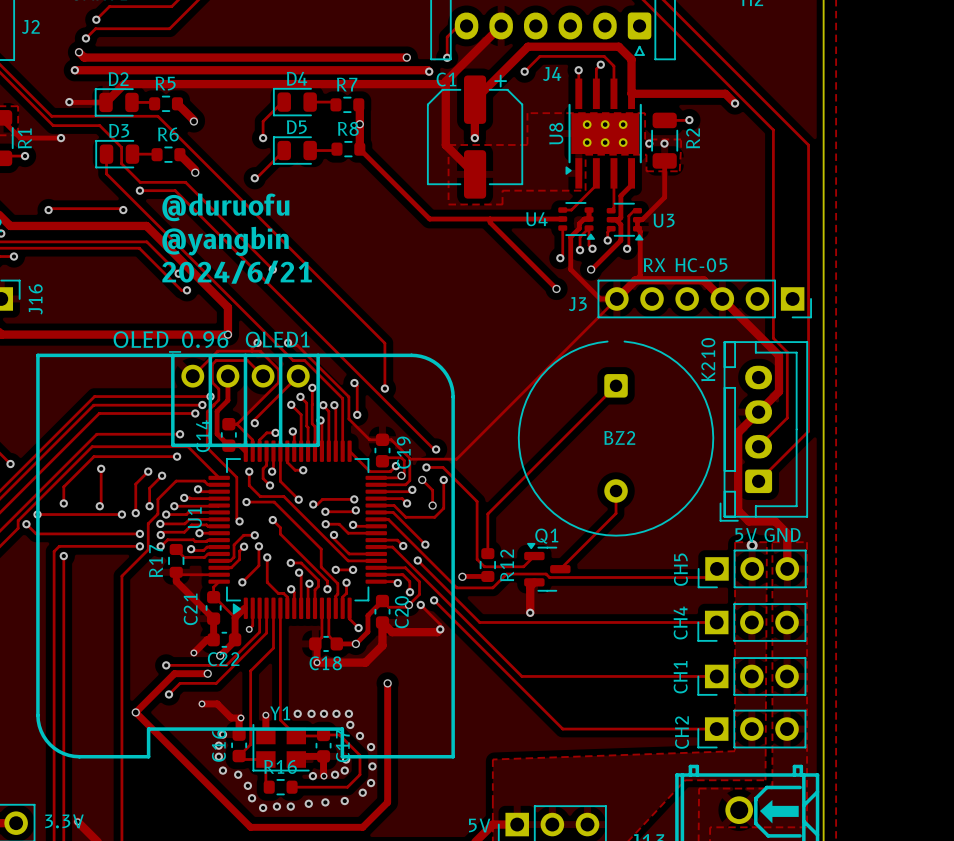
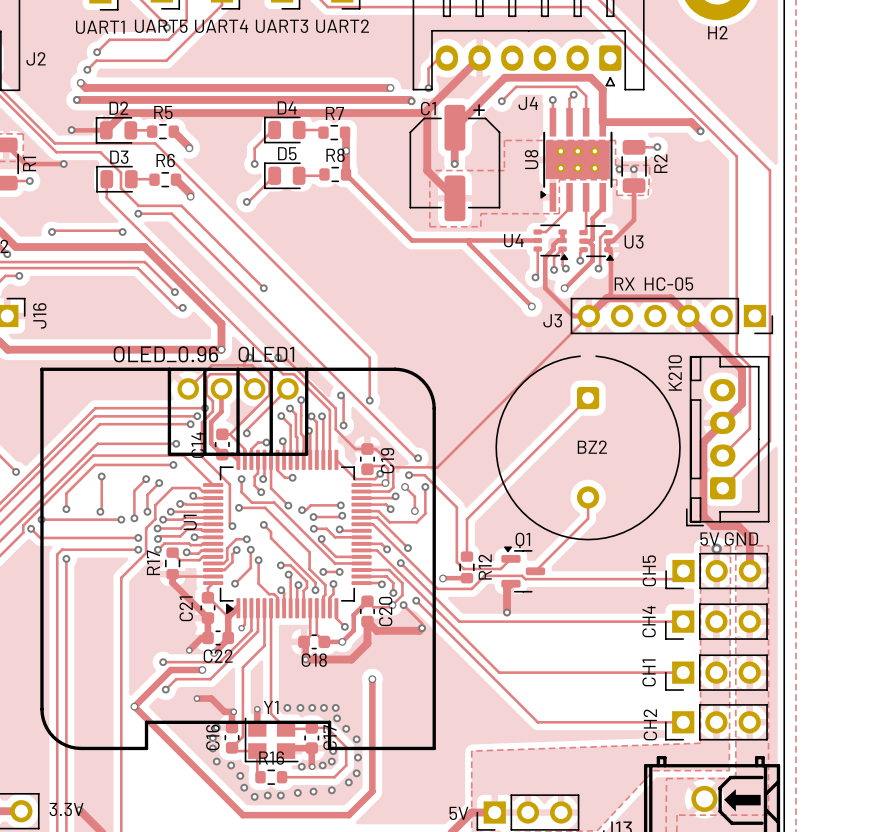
text: @duruofu (225, 207) -> none
text: @yangbin (225, 241) -> none
text: 2024/6/21 (237, 272) -> none

